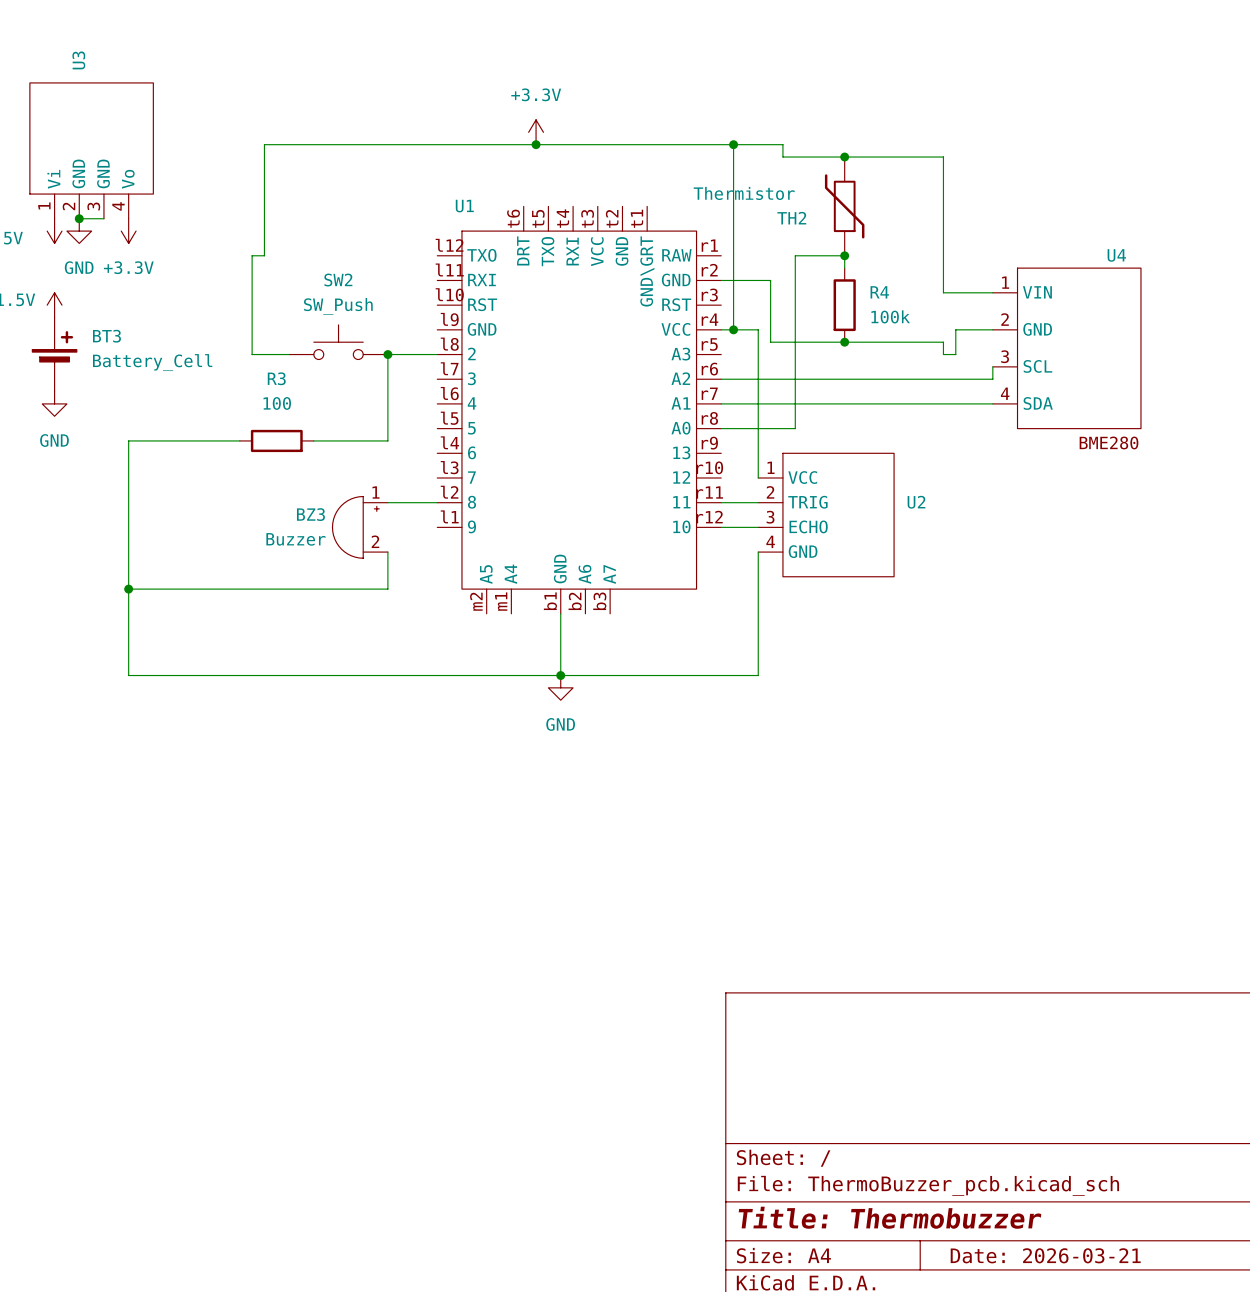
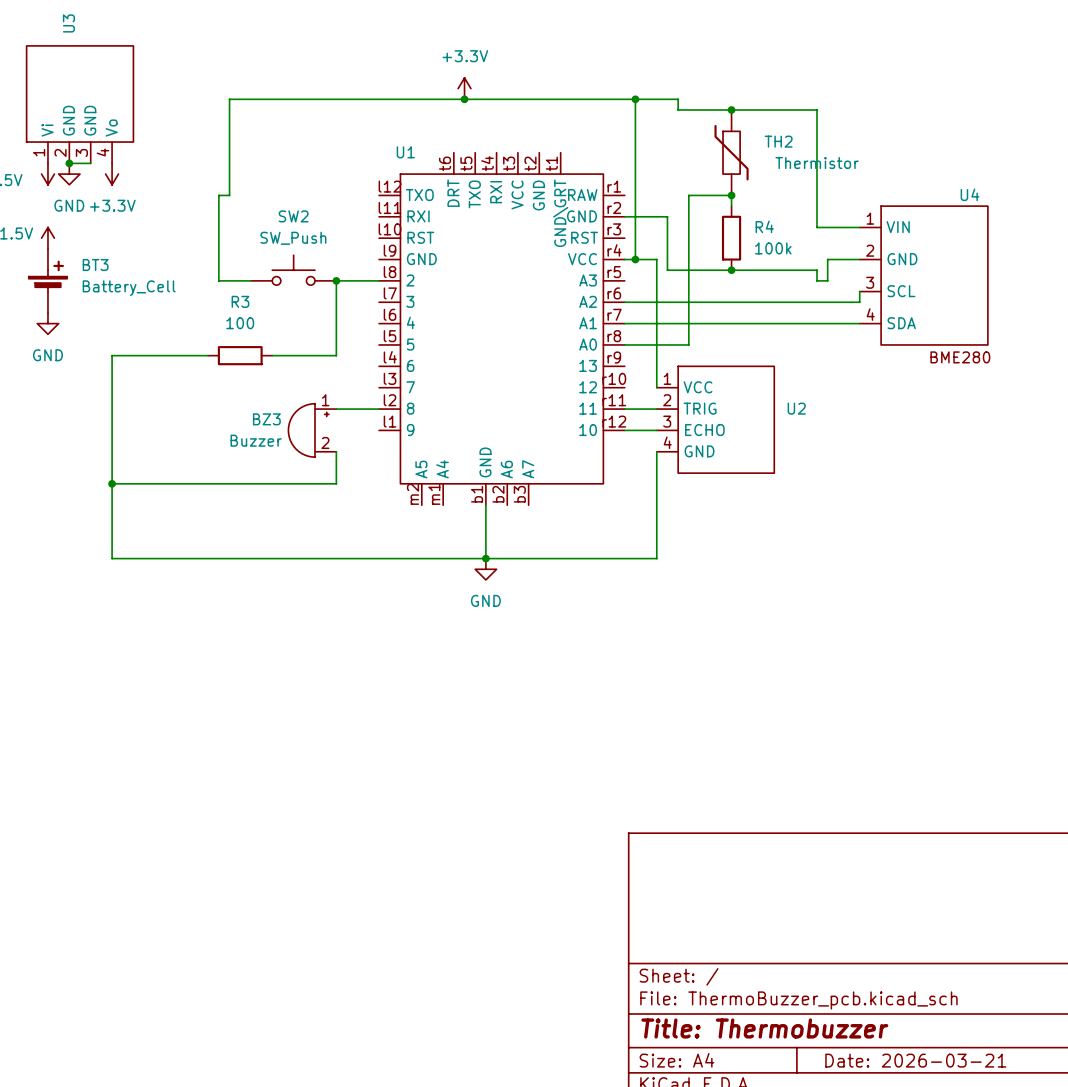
TH2 rotation: 0° (844, 206) -> 180° (731, 152)

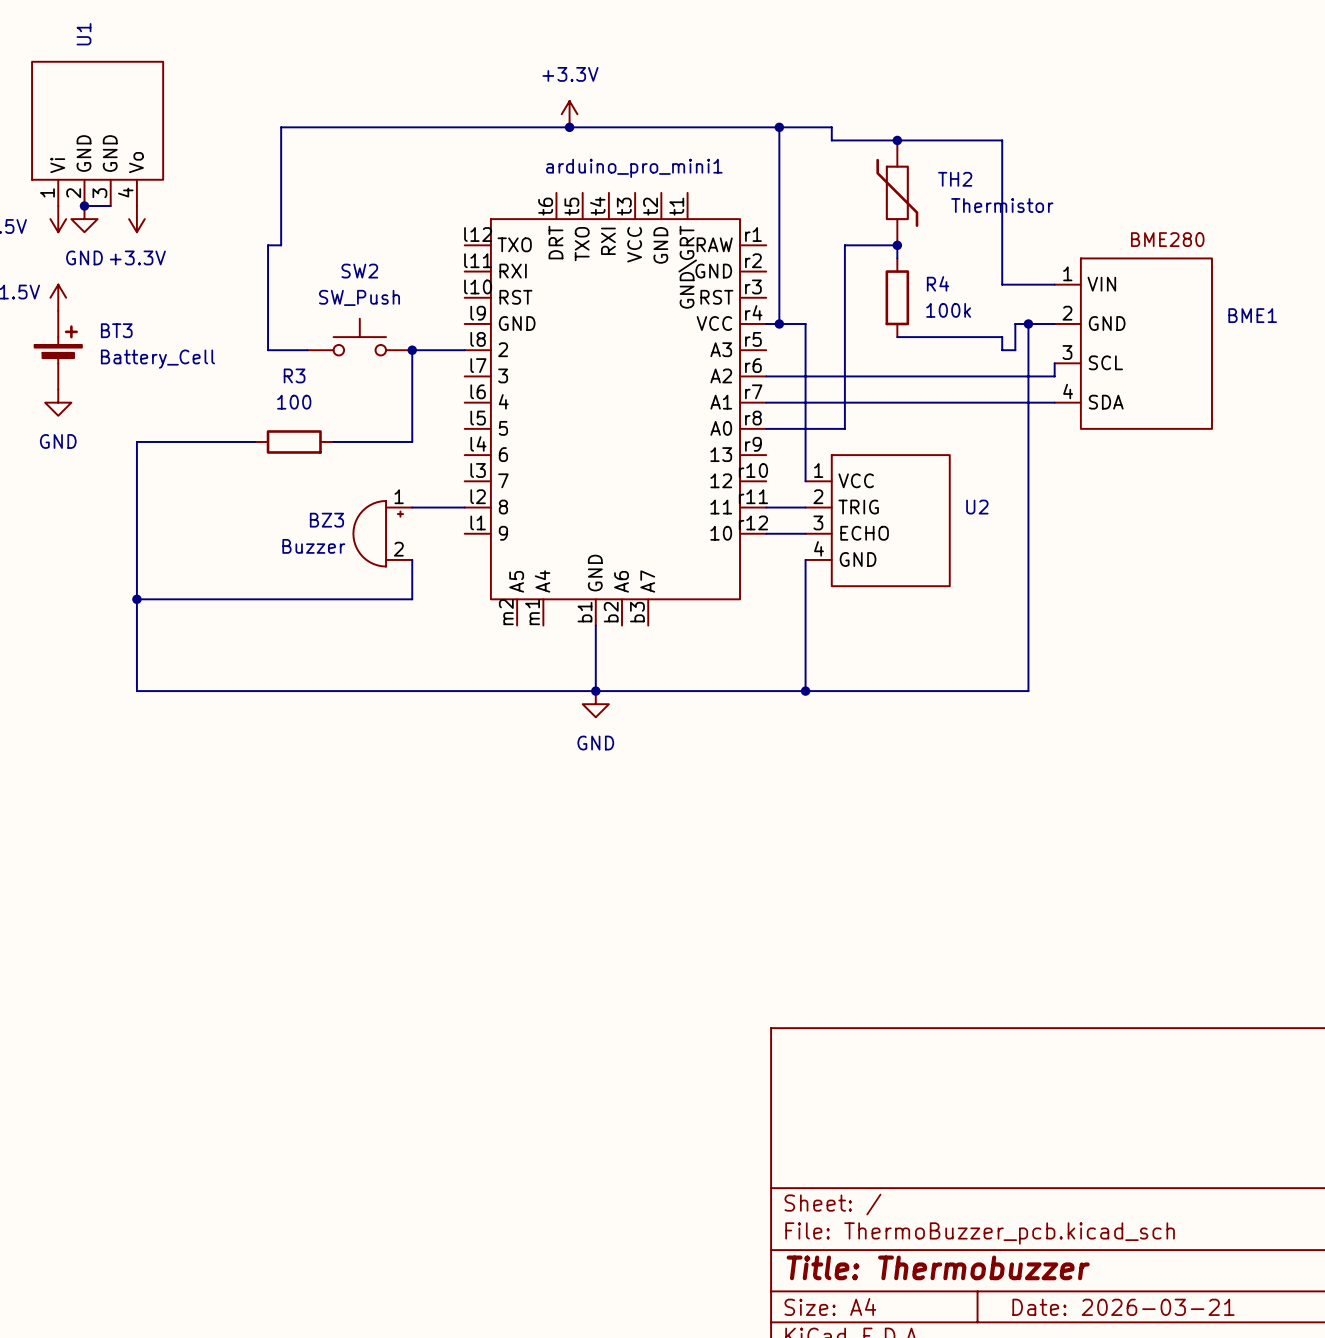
U3 name: U3 (68, 23) -> U1 (84, 34)
U1 name: U1 (405, 152) -> arduino_pro_mini1 (634, 168)
U4 name: U4 (970, 194) -> BME1 (1252, 315)
wire: (624, 216) (667, 216) (667, 270) (731, 270) -> none
wire: none -> (1028, 323) (1028, 691) (805, 691)
junction: none -> (1028, 323)
junction: (731, 270) -> none
U4 text position: BME280 (960, 357) -> BME280 (1167, 239)
junction: none -> (805, 691)

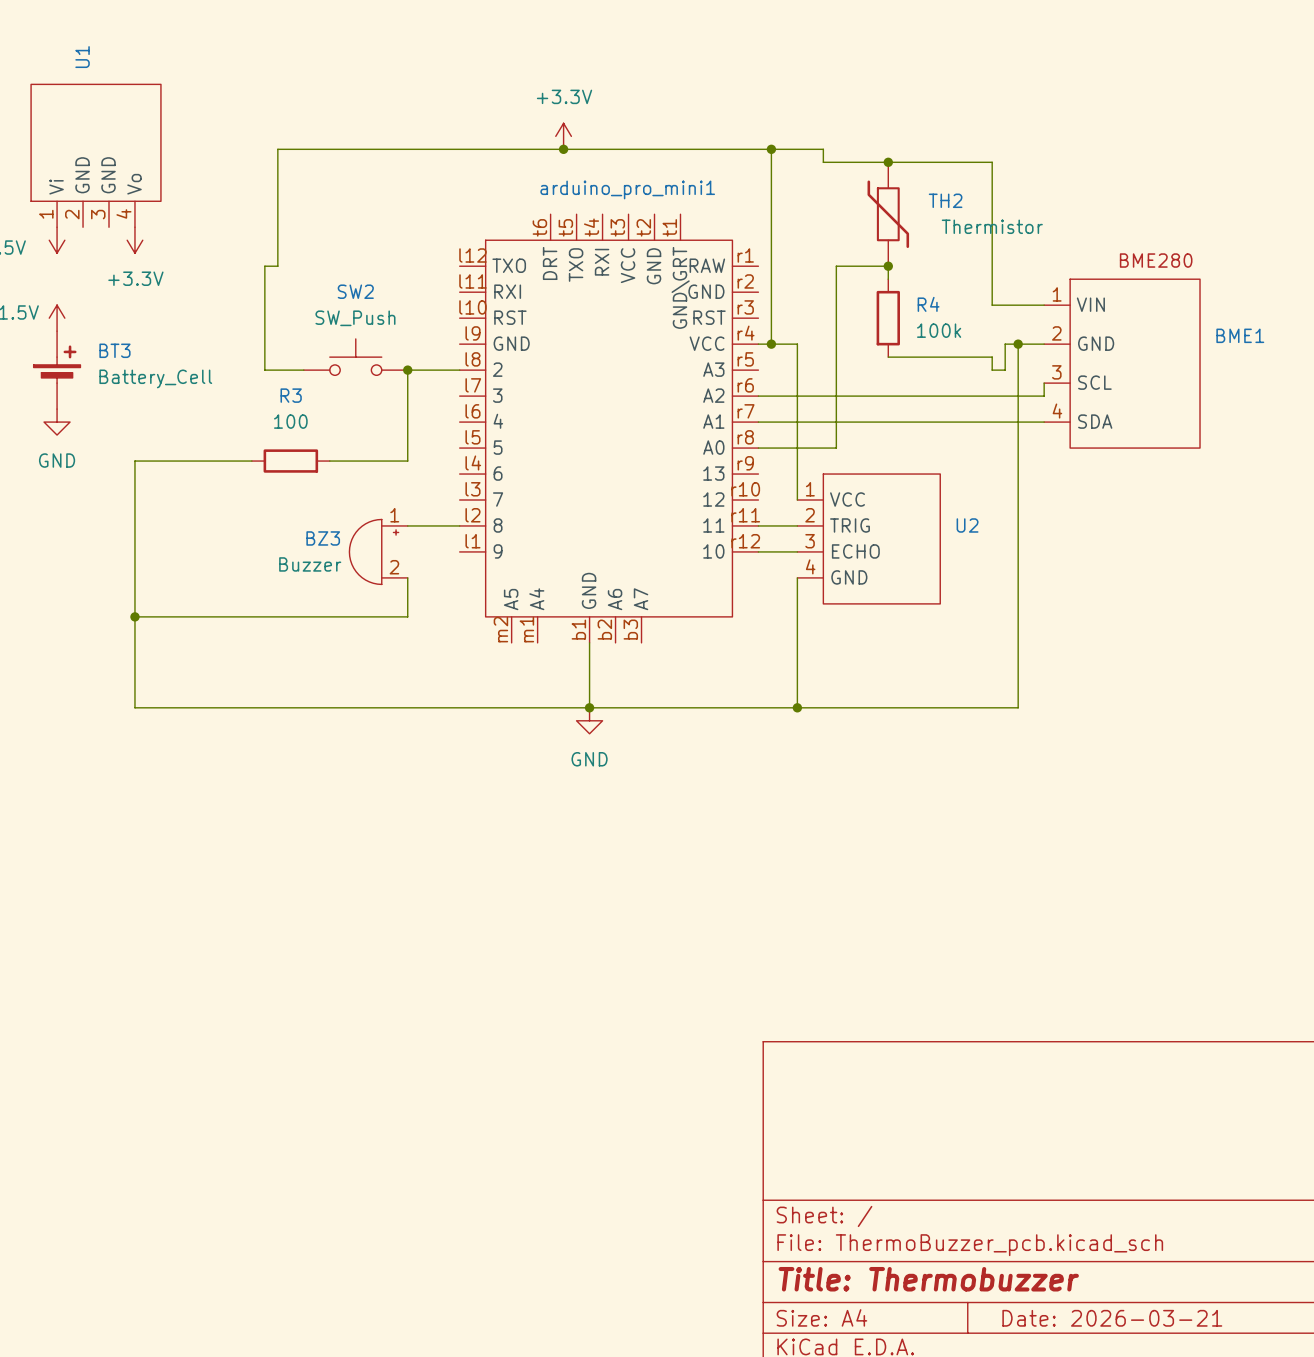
wire: (84, 206) (110, 206) -> none
junction: (84, 206) -> none
power symbol: GND (84, 219) -> none

